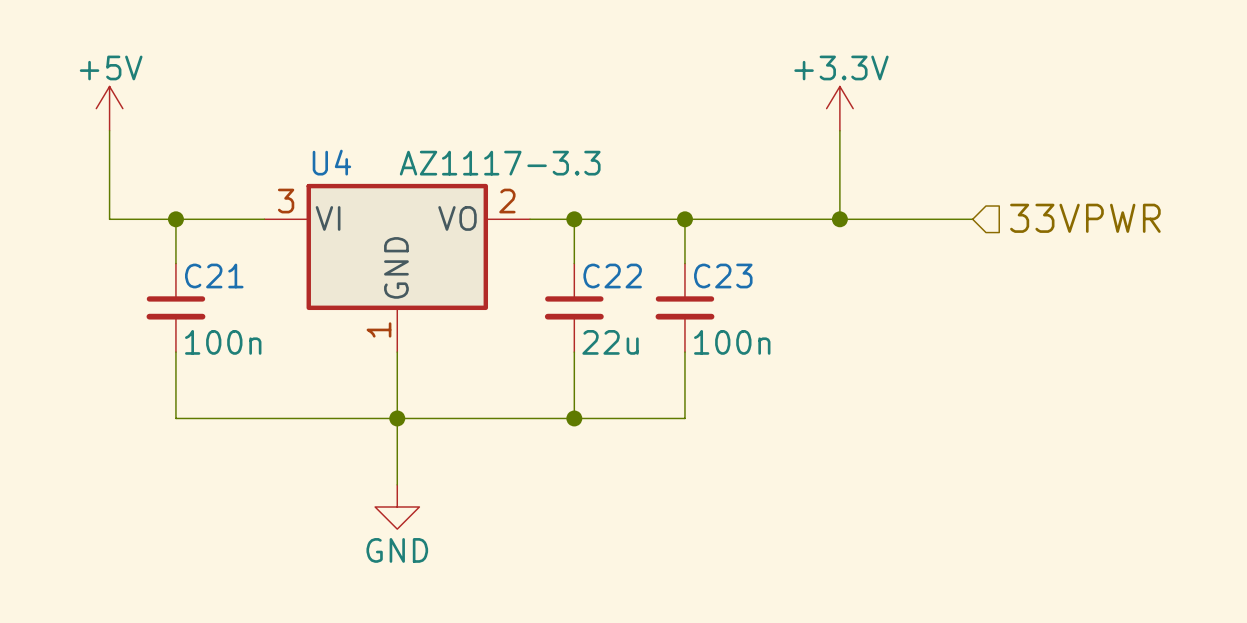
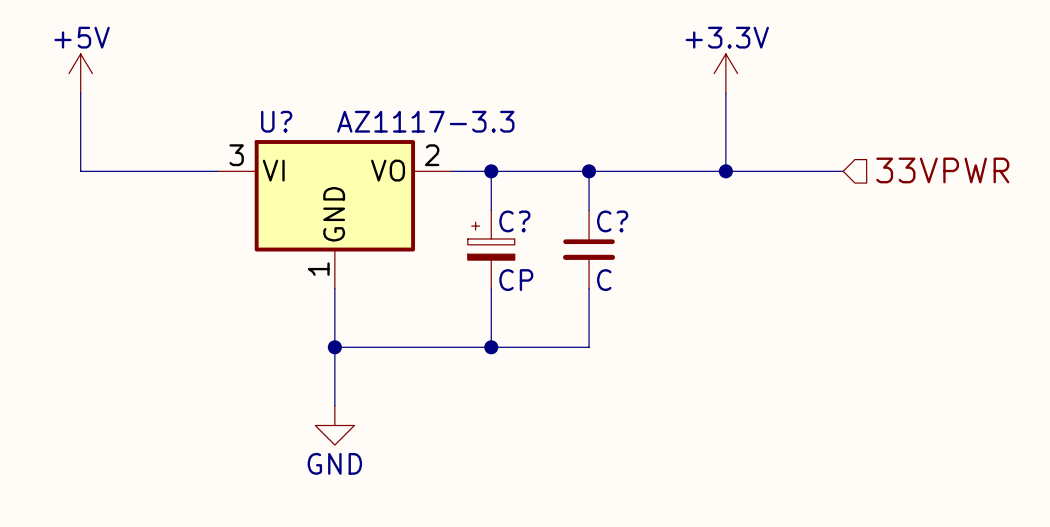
U4 name: U4 (331, 162) -> U? (276, 121)
wire: (175, 219) (175, 263) -> none
junction: (175, 219) -> none
C23 name: C23 (723, 276) -> C? (612, 221)
C21: 100n (175, 307) -> none
C22: 22u (574, 307) -> none
C?: none -> CP (491, 249)
C23 value: 100n (732, 342) -> C (604, 280)
wire: (175, 352) (175, 418) (397, 418) -> none

